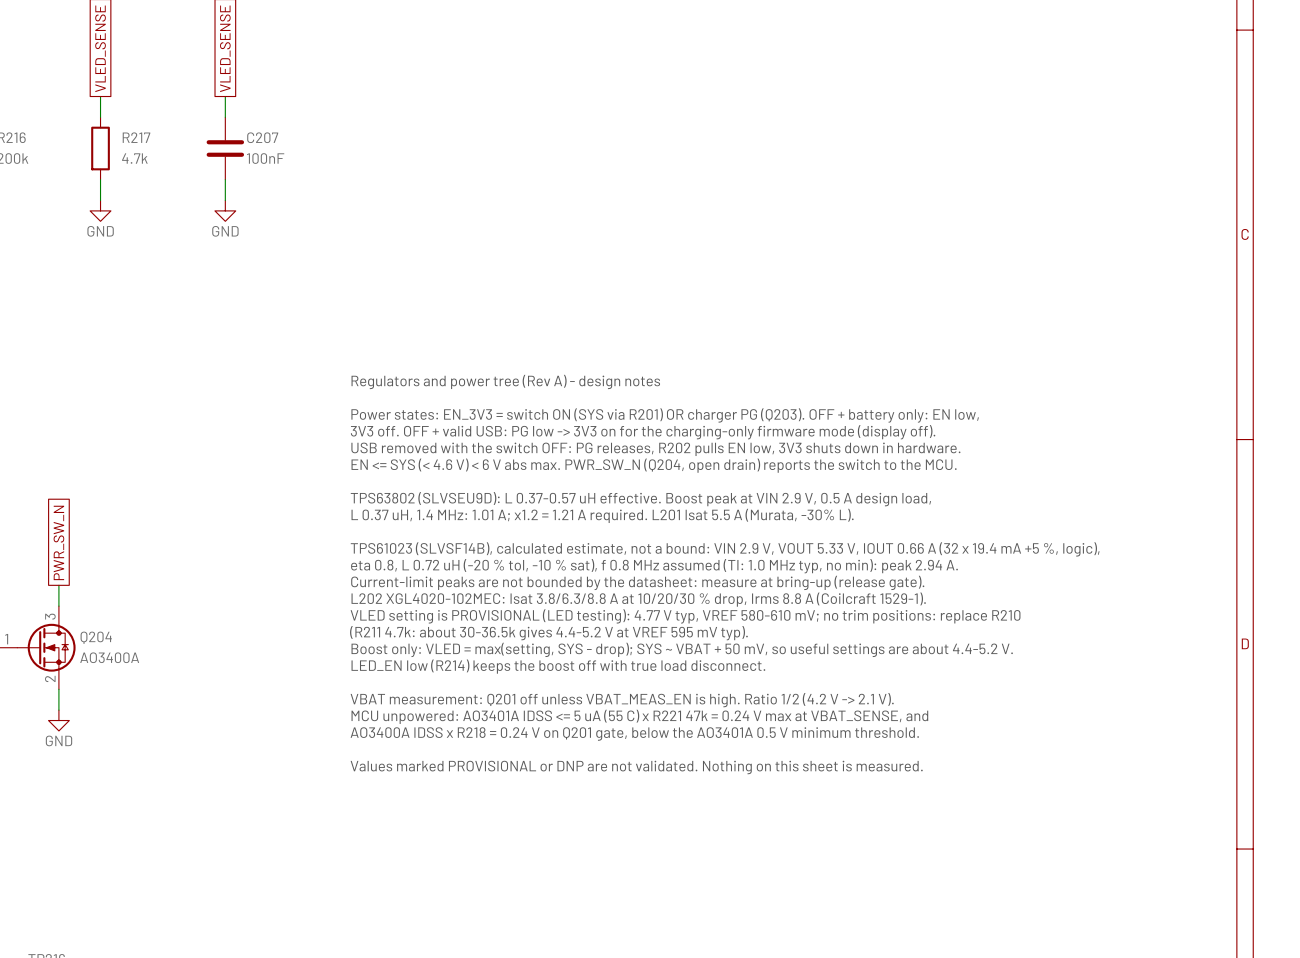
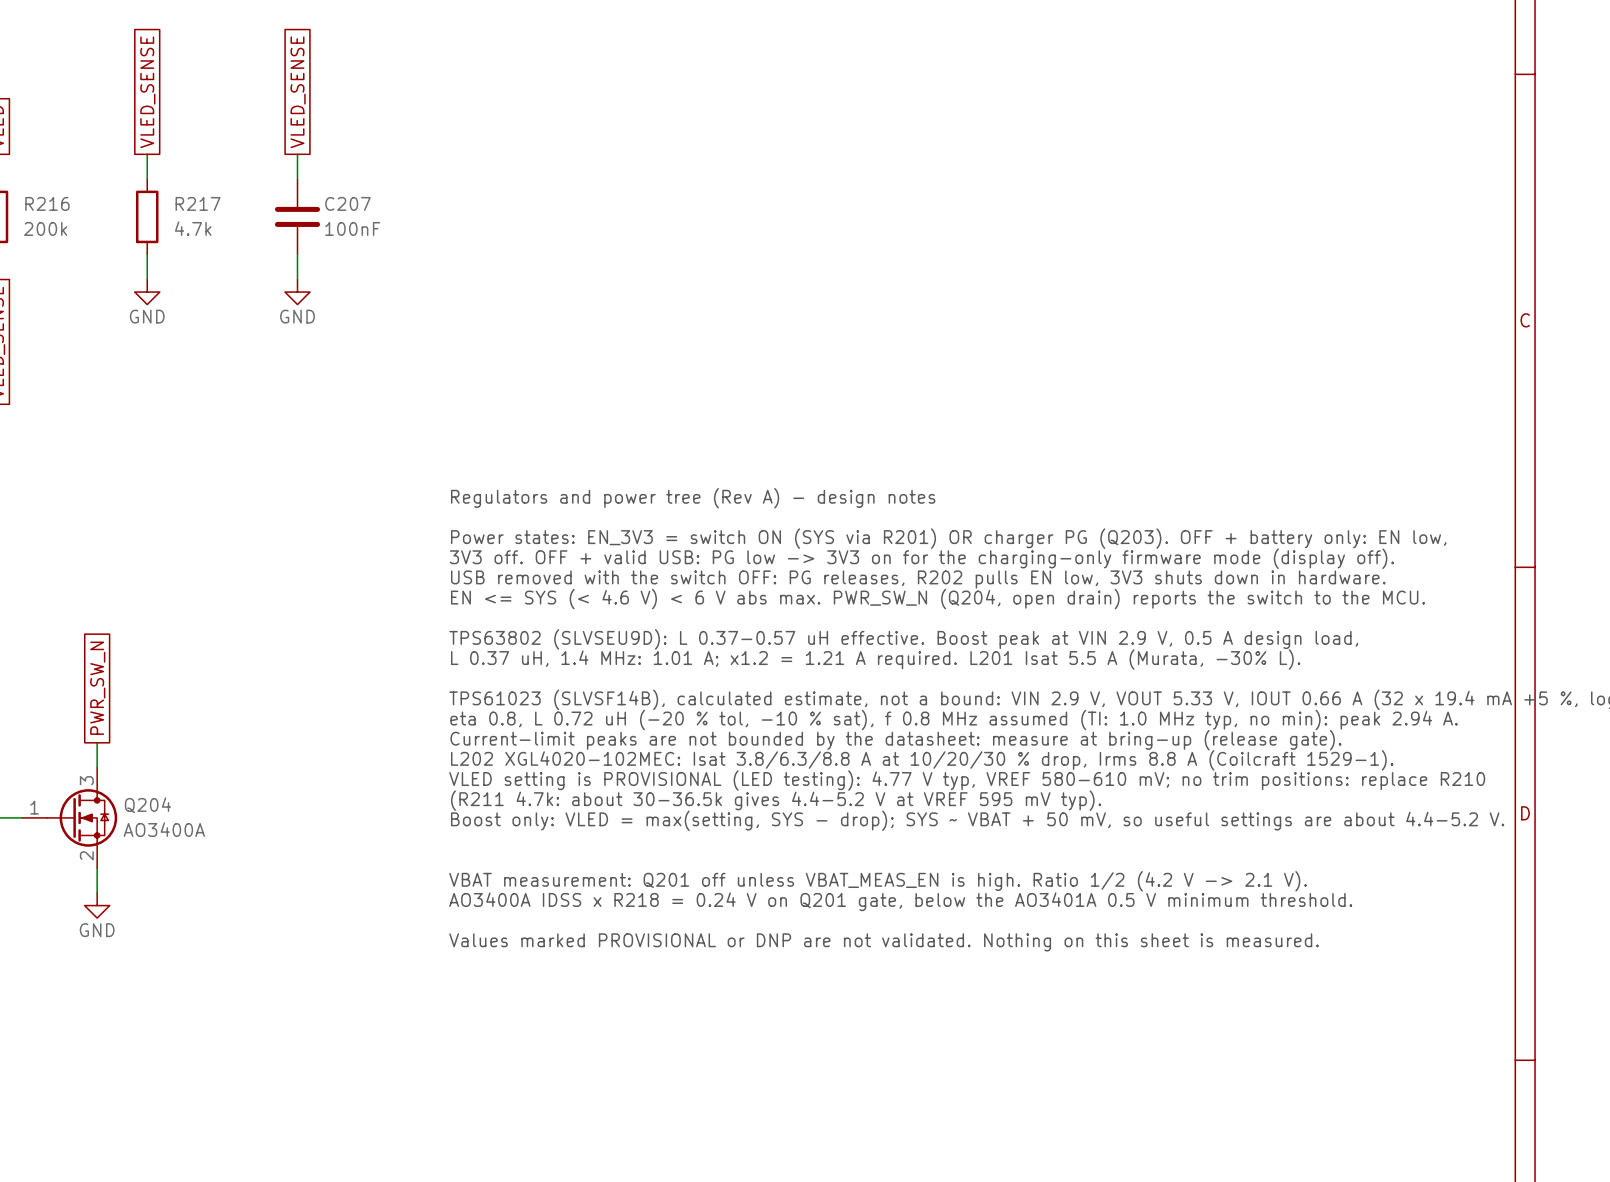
text: LED_EN low (R214) keeps the boost off with true load disconnect. (558, 666) -> none
text: MCU unpowered: AO3401A IDSS <= 5 uA (55 C) x R221 47k = 0.24 V max at VBAT_SENSE, and (639, 716) -> AO3400A IDSS x R218 = 0.24 V on Q201 gate, below the AO3401A 0.5 V minimum threshold. (900, 901)
text: AO3400A IDSS x R218 = 0.24 V on Q201 gate, below the AO3401A 0.5 V minimum threshold. (634, 734) -> none
text position: Values marked PROVISIONAL or DNP are not validated. Nothing on this sheet is measured. (636, 767) -> Values marked PROVISIONAL or DNP are not validated. Nothing on this sheet is measured. (884, 942)

